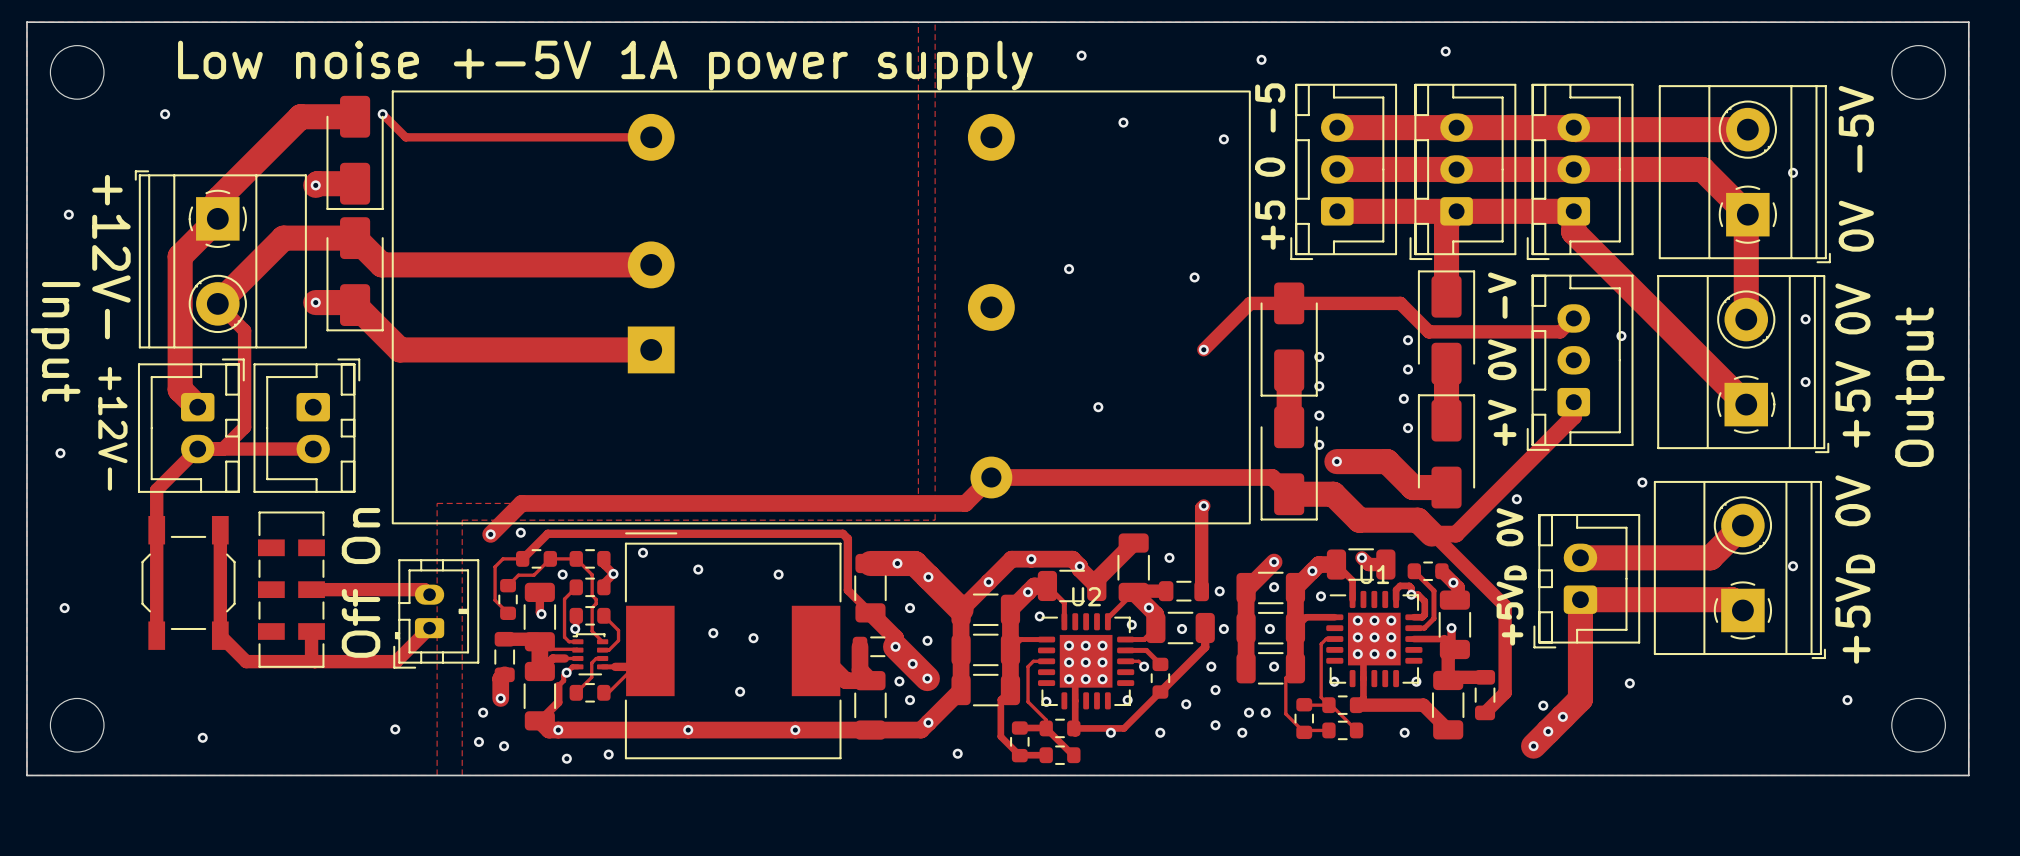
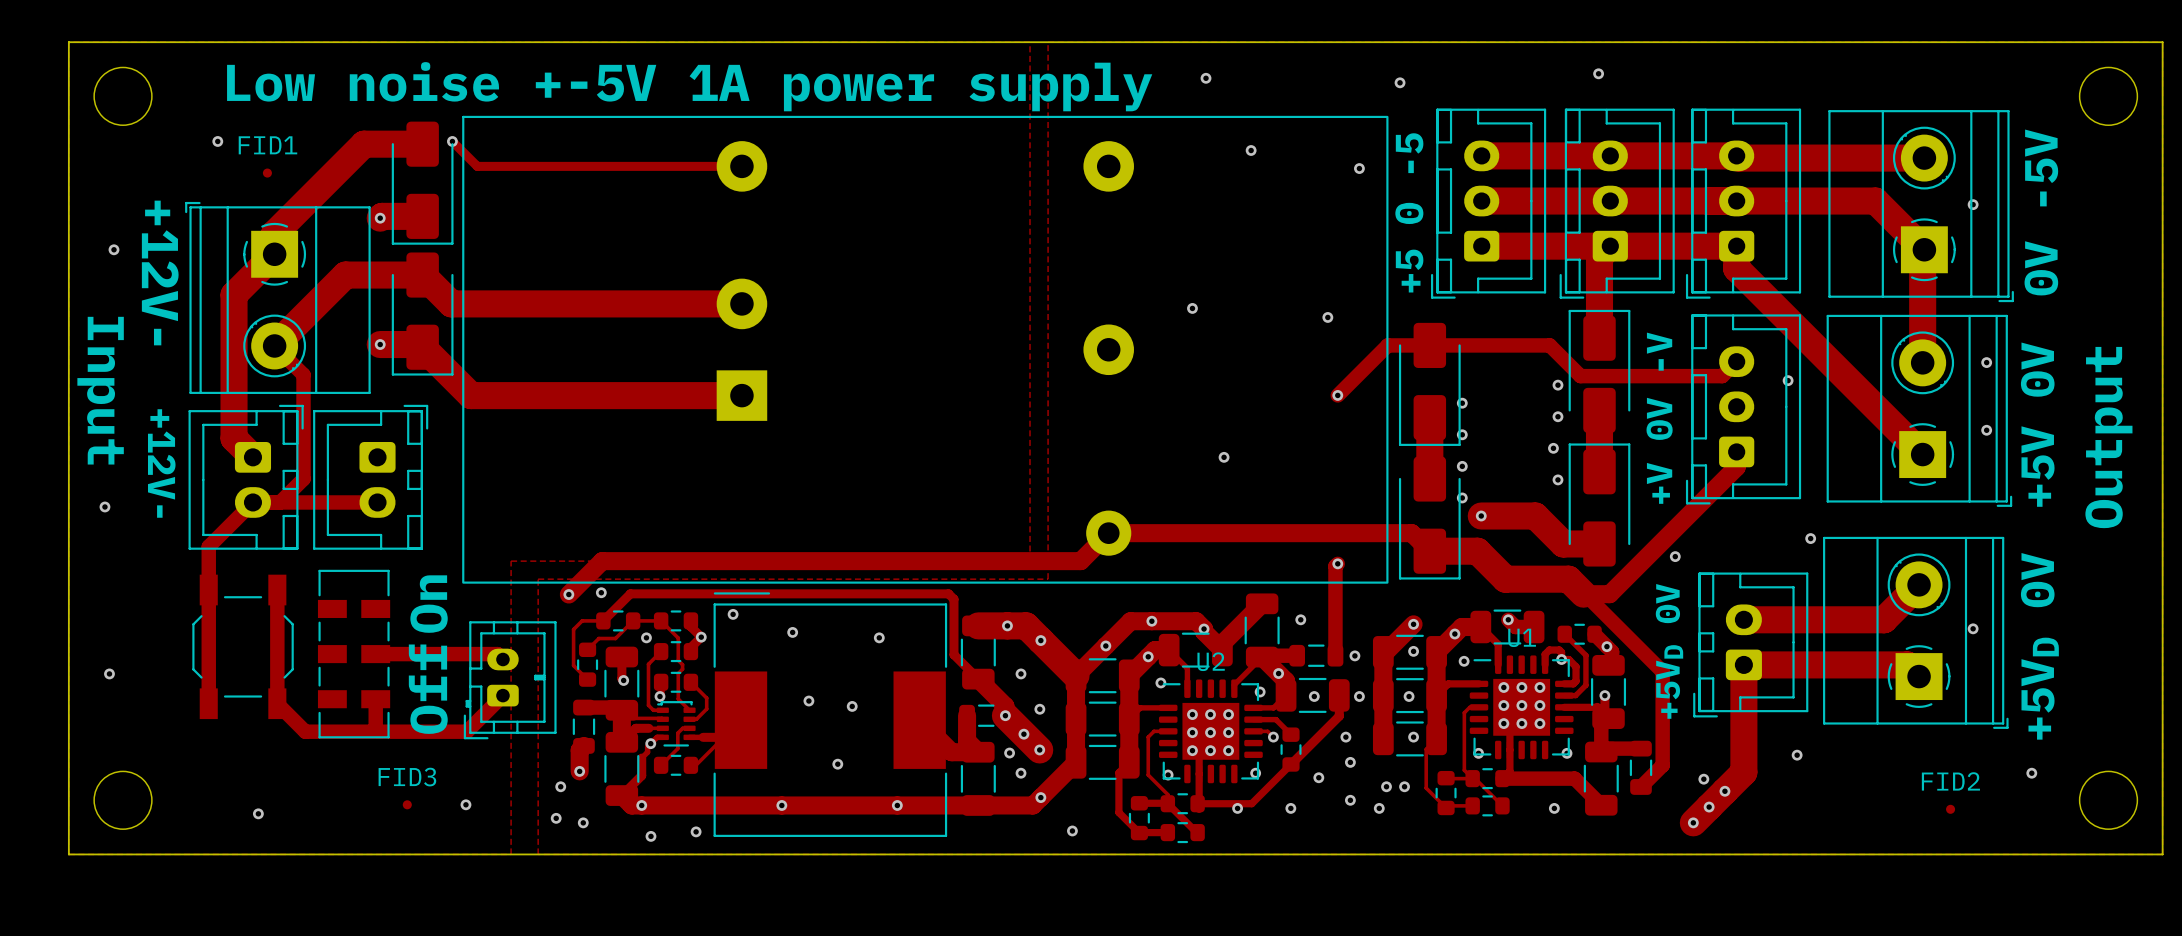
FID1: none -> (267, 173)
FID3: none -> (407, 804)
FID2: none -> (1950, 809)

